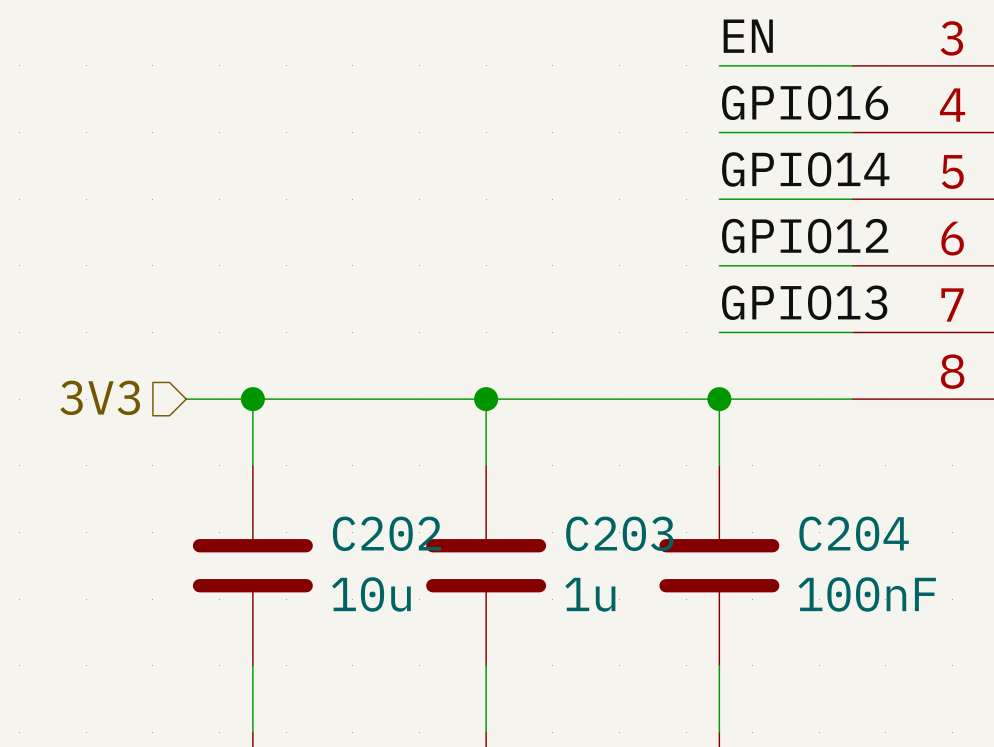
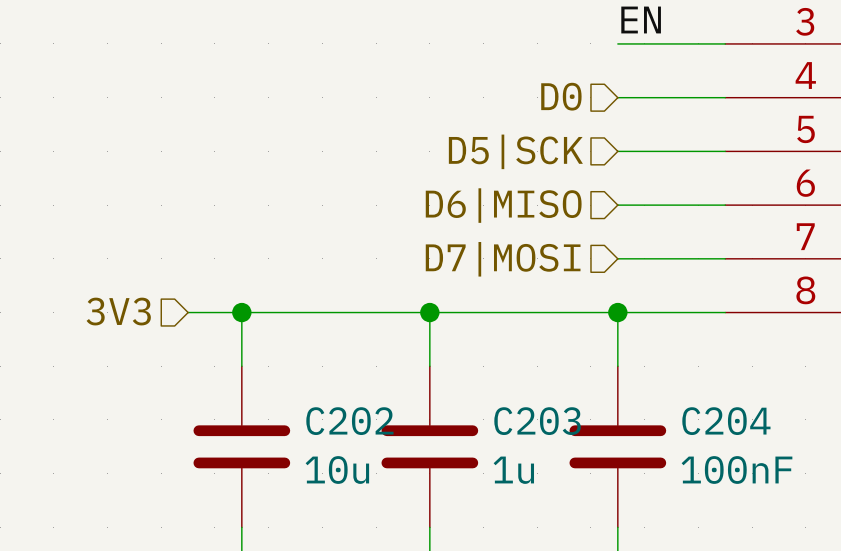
label: GPIO16 (805, 102) -> none
hierarchical label: none -> D0 (561, 96)
label: GPIO14 (805, 169) -> none
hierarchical label: none -> D5|SCK (515, 151)
label: GPIO12 (805, 236) -> none
hierarchical label: none -> D6|MISO (503, 205)
label: GPIO13 (804, 302) -> none
hierarchical label: none -> D7|MOSI (503, 259)

